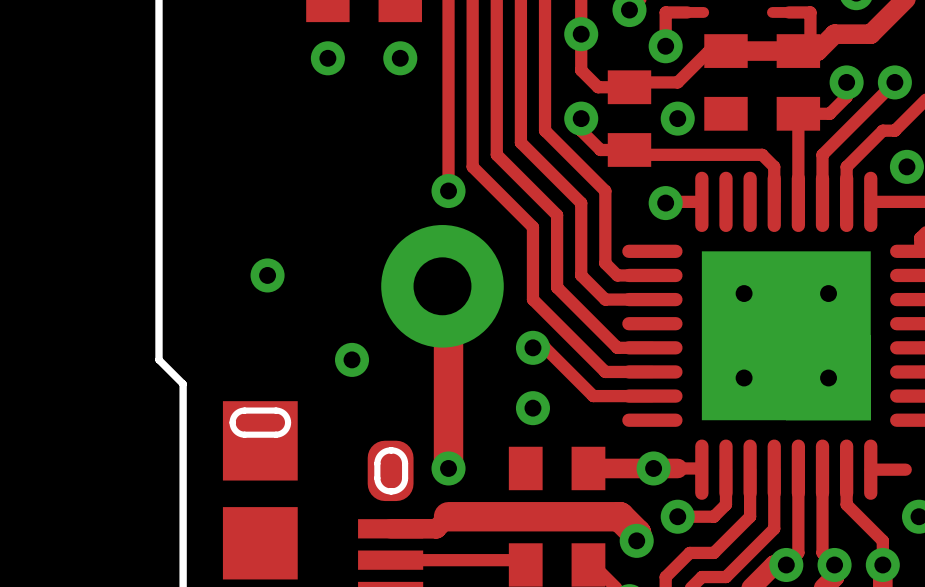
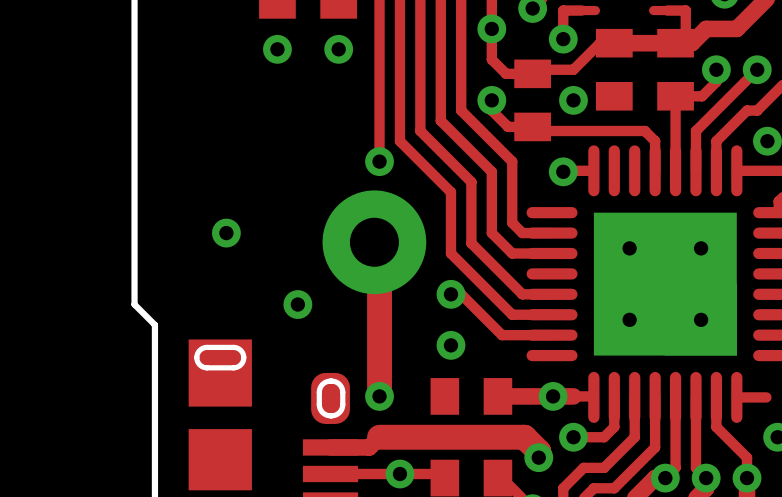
via: none -> (399, 473)

